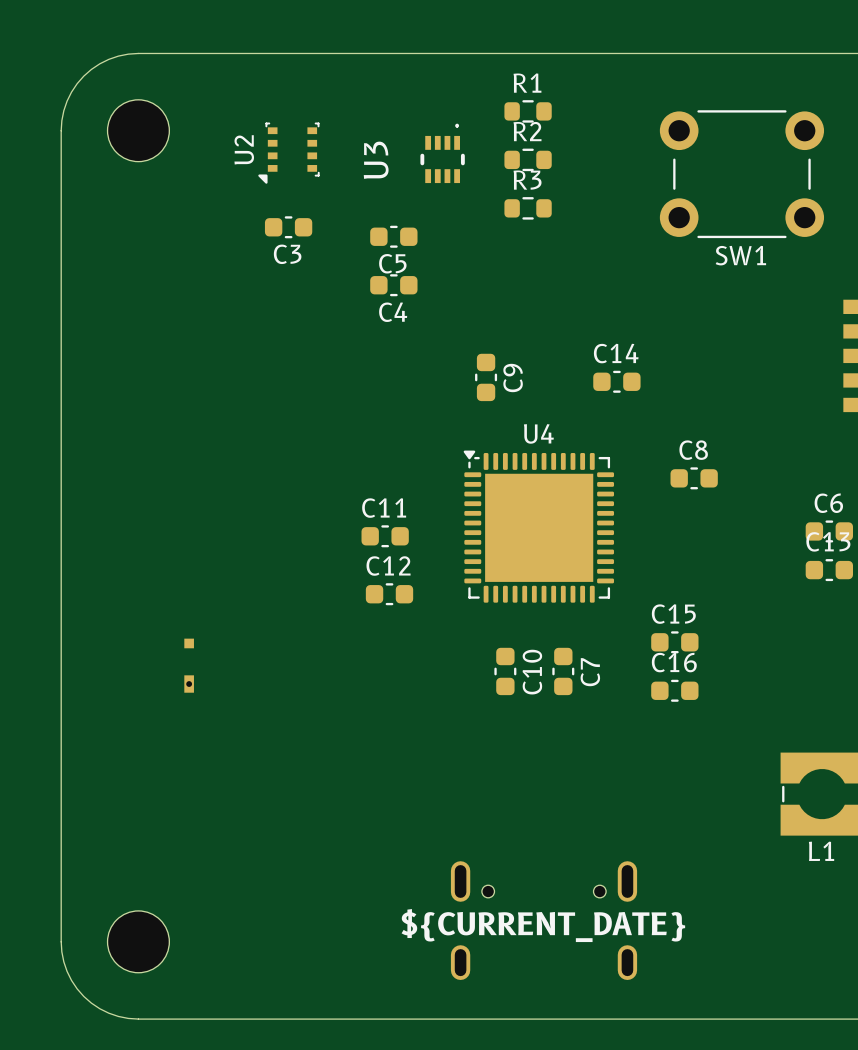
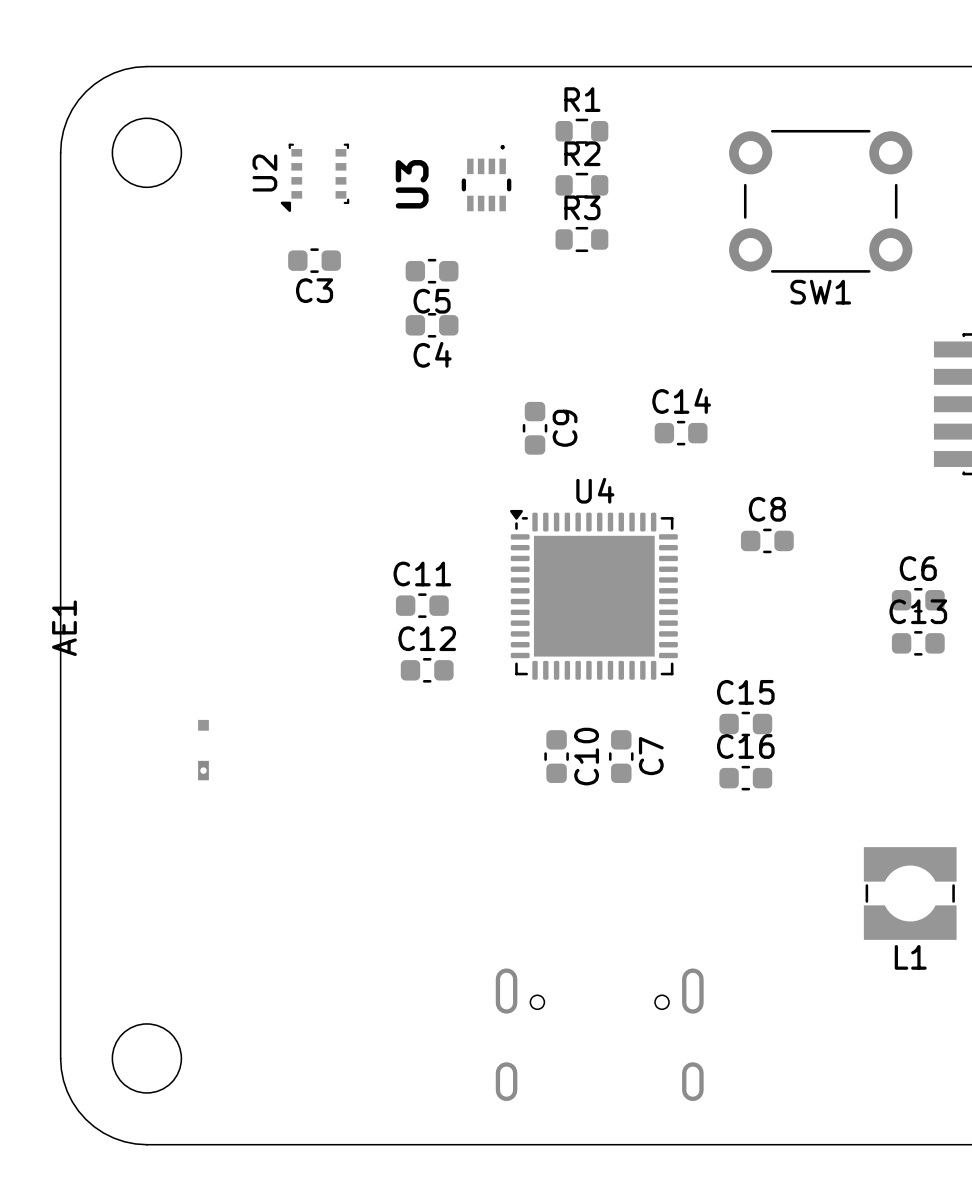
AE1 name: none -> AE1 (64, 628)
text: ${CURRENT_DATE} (543, 925) -> none

